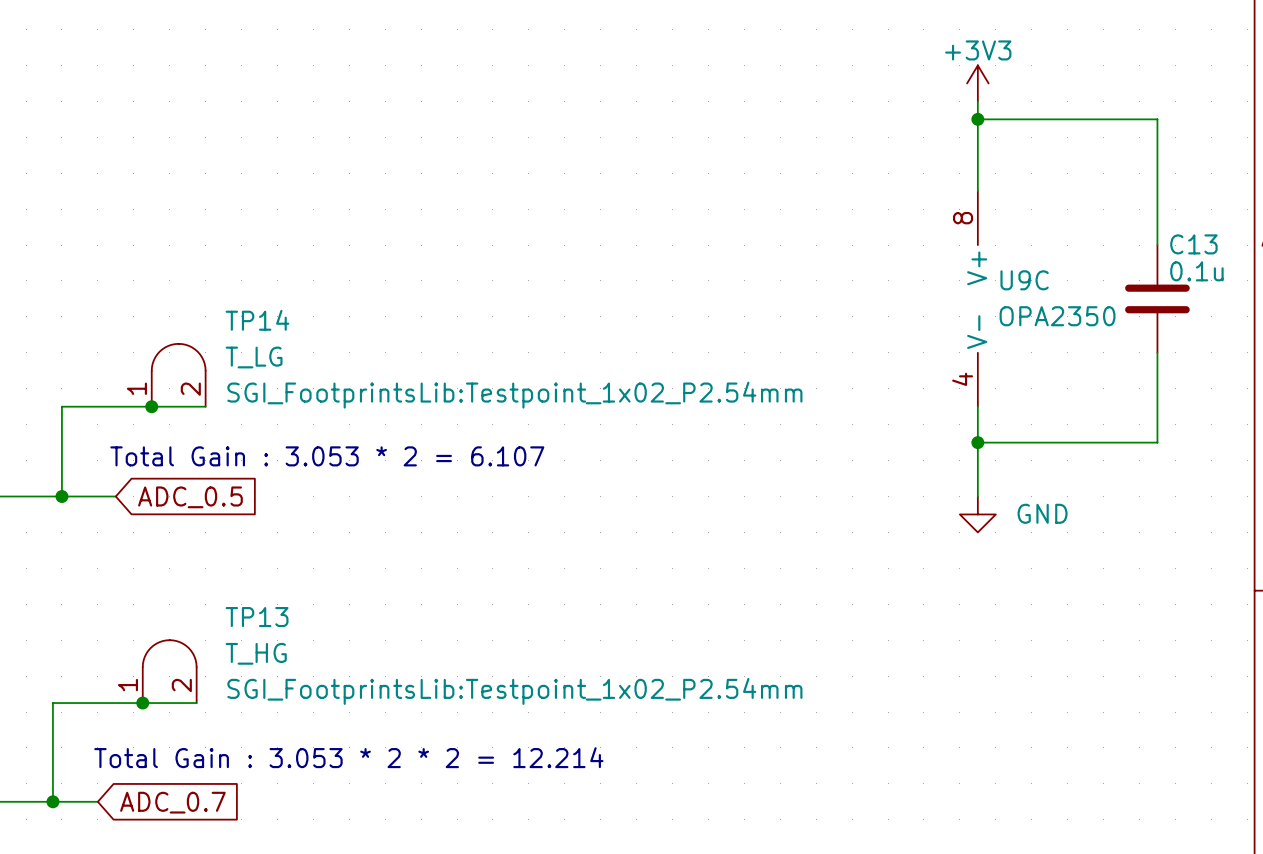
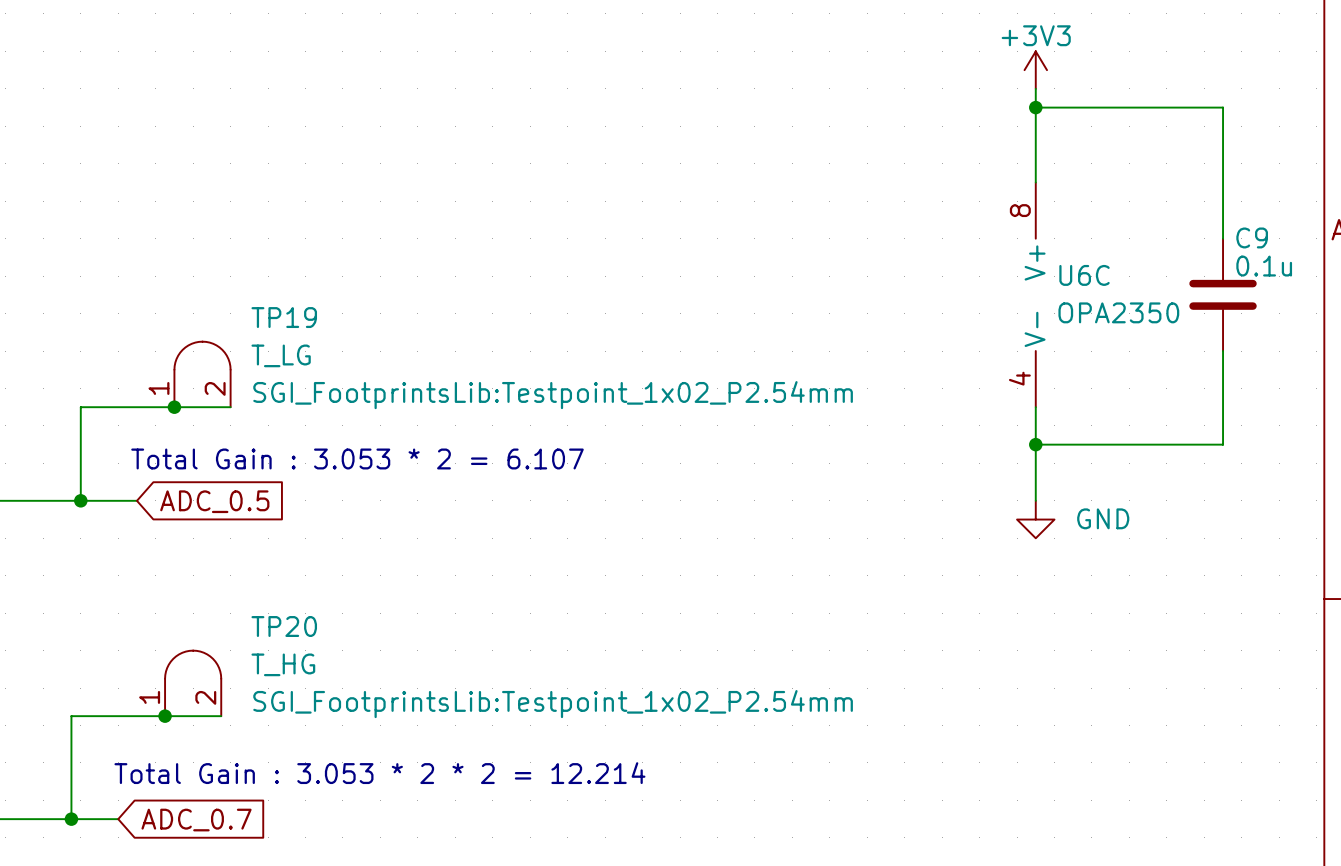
C13 name: C13 (1193, 244) -> C9 (1252, 237)
U9C name: U9C (1024, 280) -> U6C (1084, 275)
TP14 name: TP14 (257, 320) -> TP19 (284, 317)
TP13 name: TP13 (257, 617) -> TP20 (284, 626)

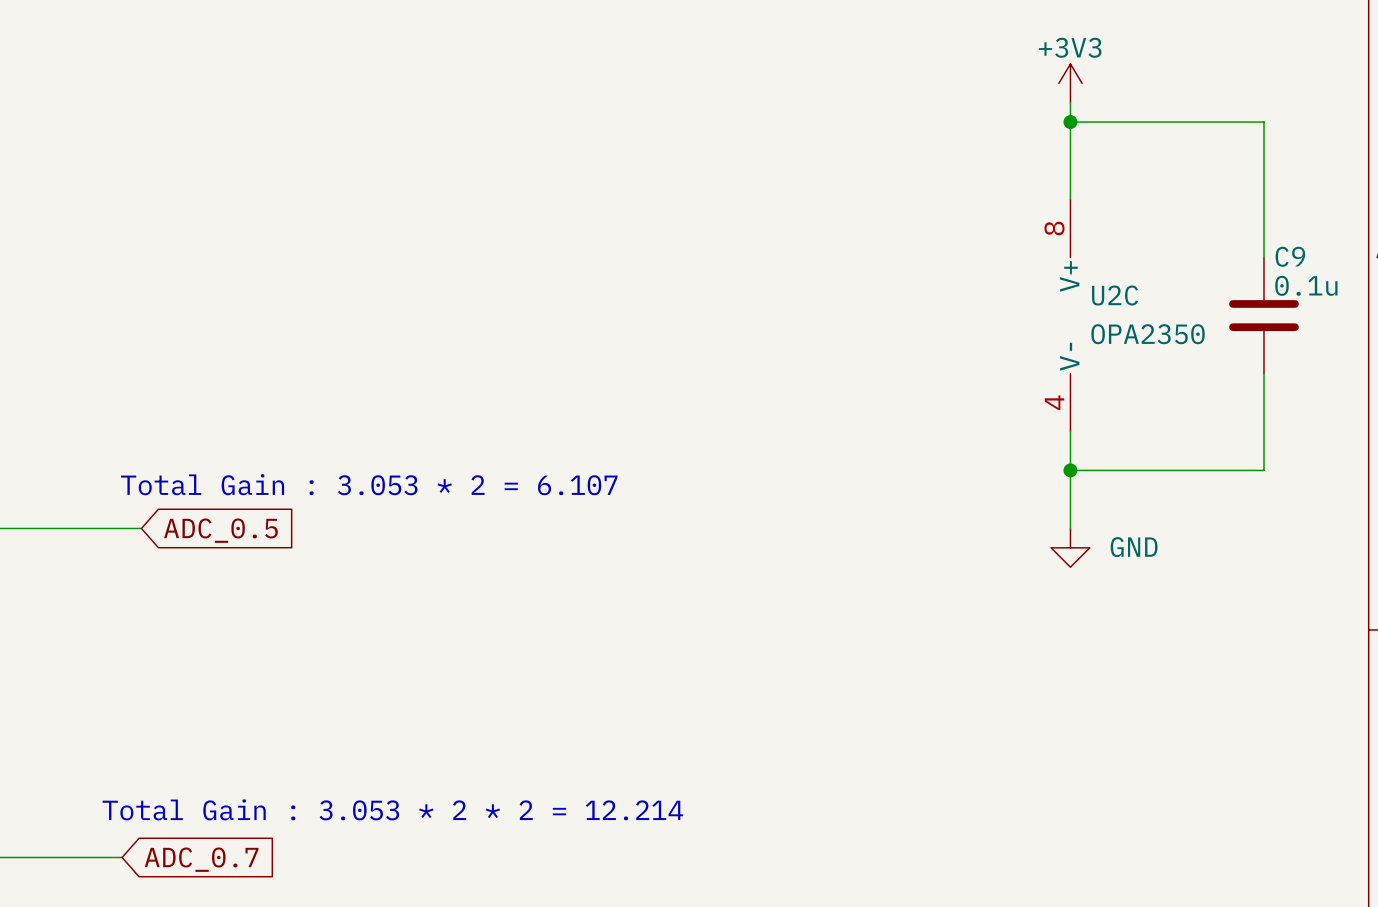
U6C name: U6C (1084, 275) -> U2C (1115, 295)
TP19: T_LG (202, 374) -> none
junction: (174, 407) -> none
wire: (230, 407) (80, 407) (80, 500) -> none
junction: (80, 500) -> none
TP20: T_HG (193, 683) -> none
junction: (165, 716) -> none
wire: (221, 716) (71, 716) (71, 819) -> none
junction: (71, 819) -> none

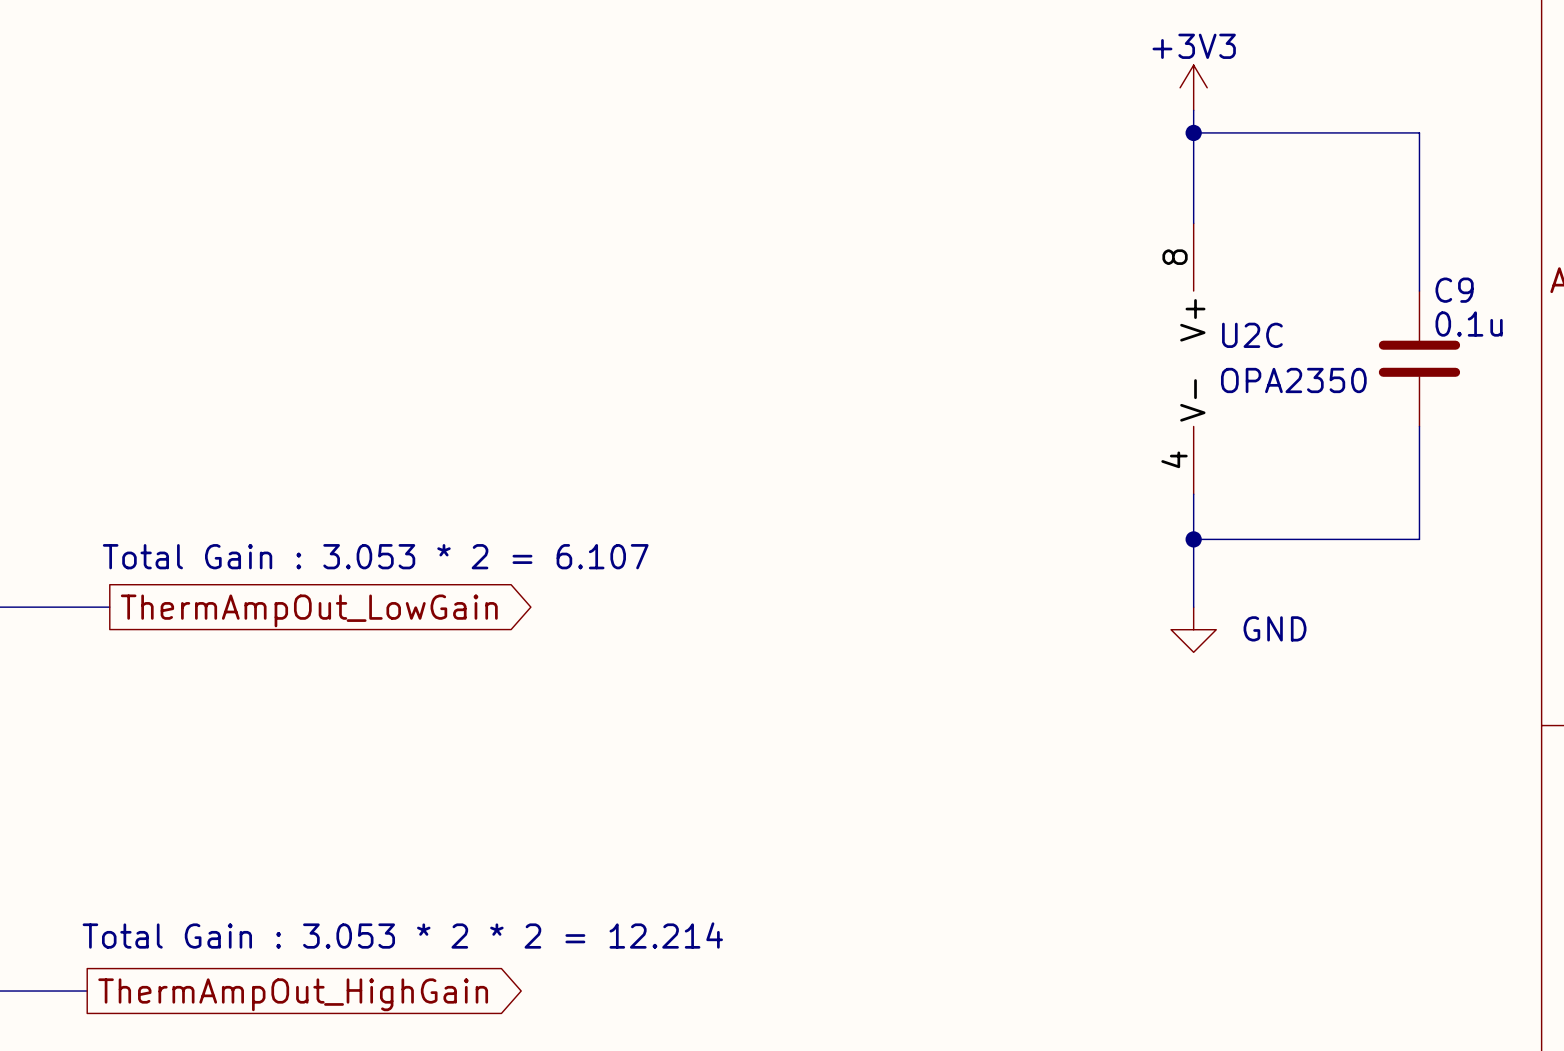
global label shape: input (220, 530) -> output (309, 610)
global label: ADC_0.5 (220, 530) -> ThermAmpOut_LowGain (309, 610)
global label shape: input (201, 859) -> output (293, 994)
global label: ADC_0.7 (201, 859) -> ThermAmpOut_HighGain (293, 994)

